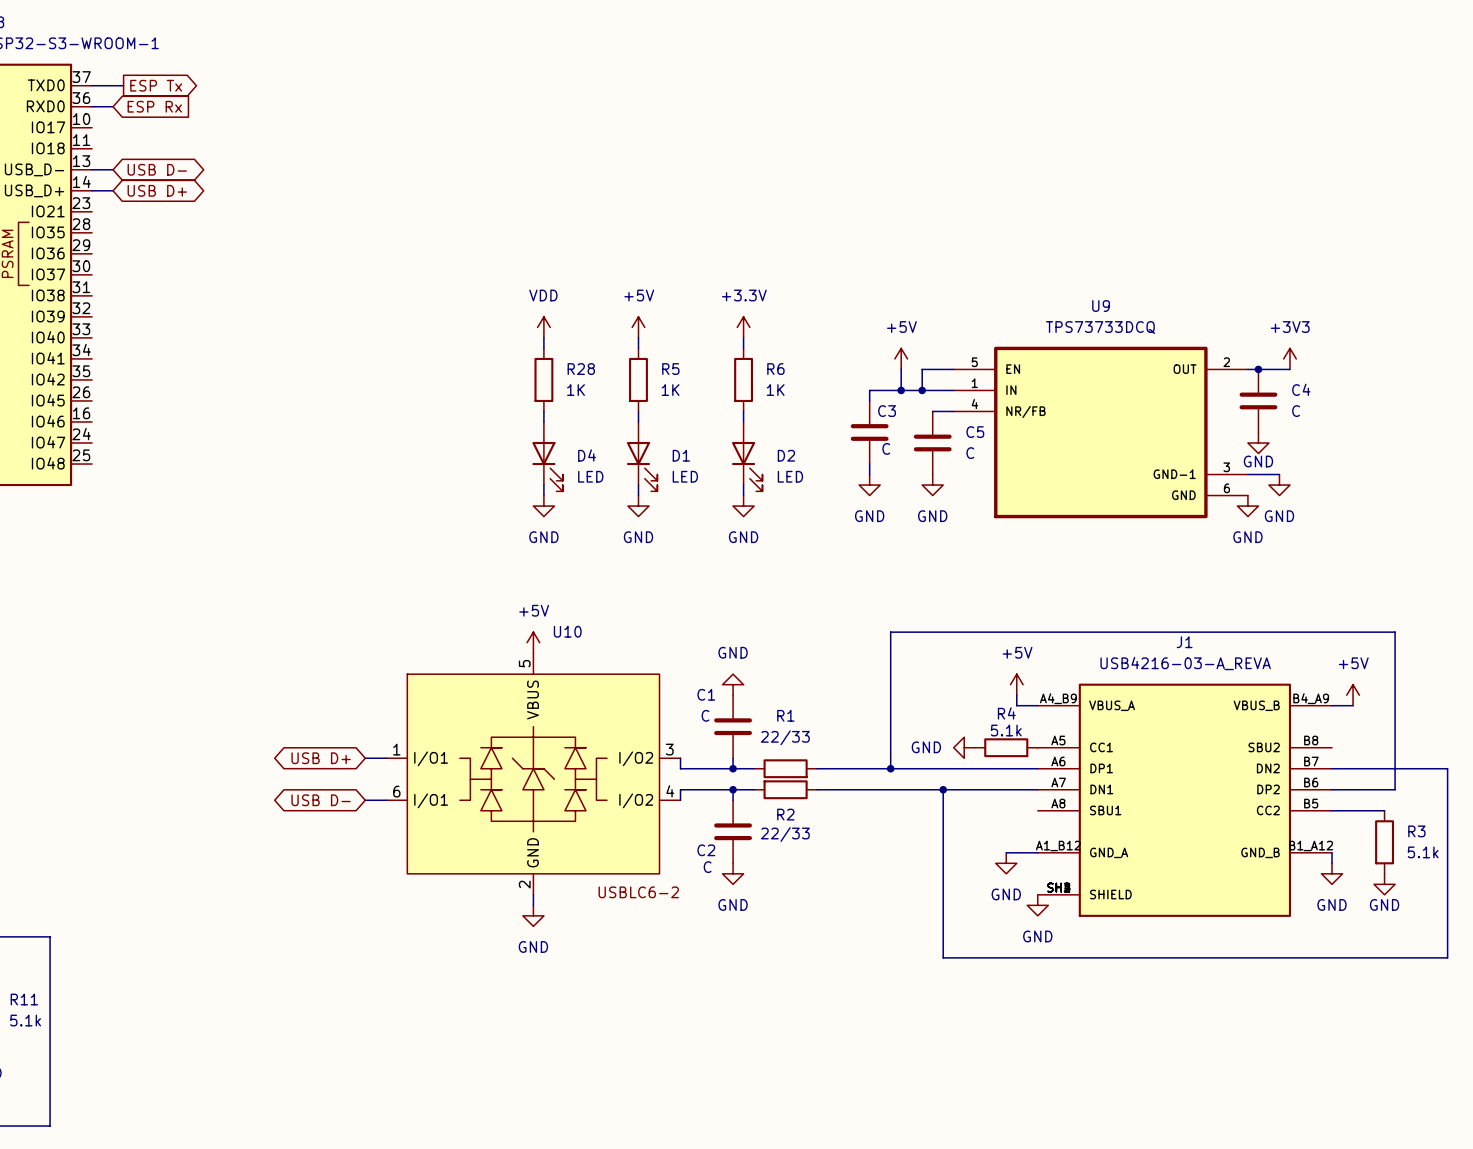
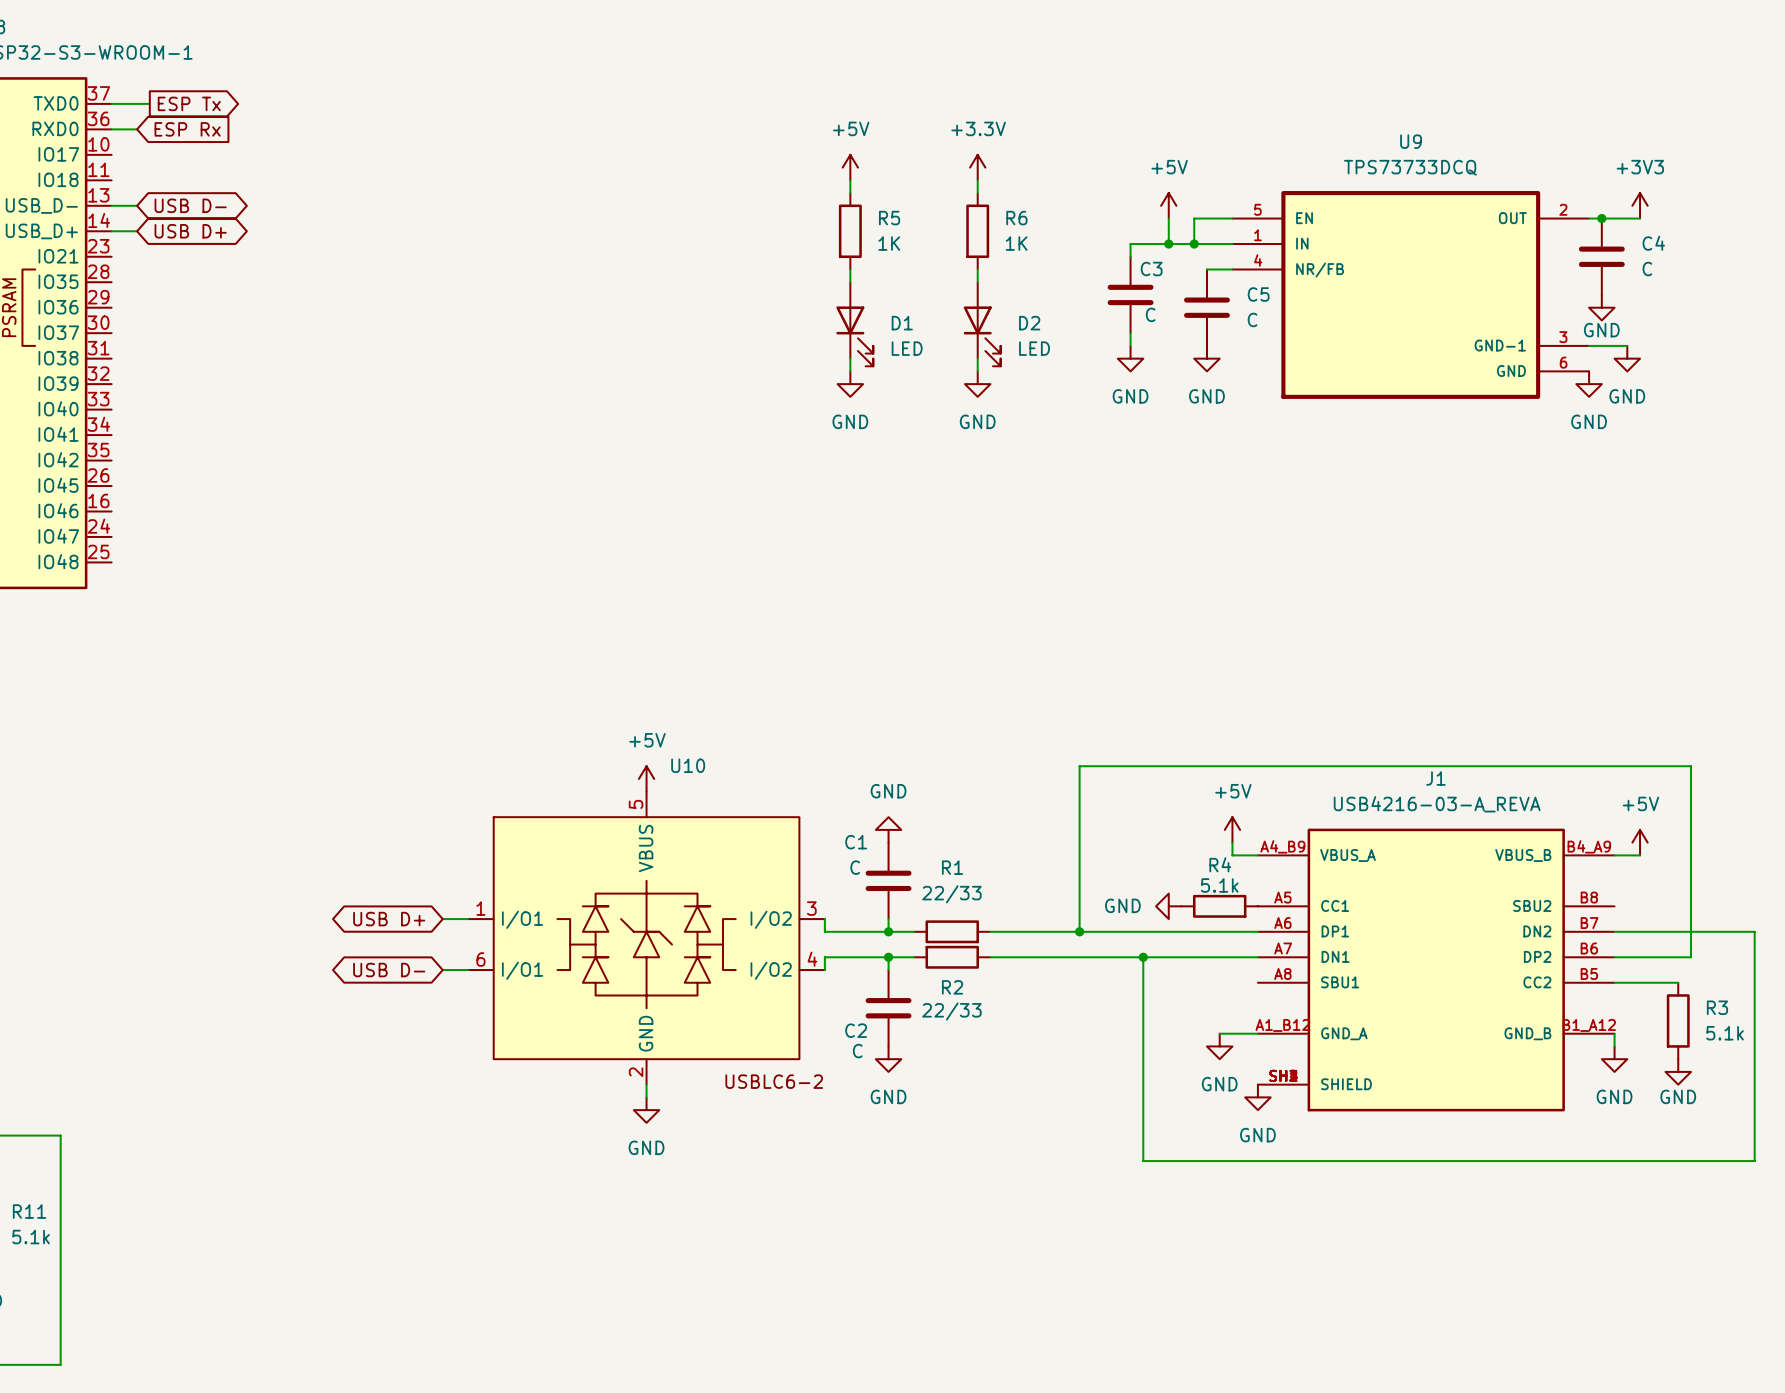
power symbol: none -> +5V (850, 167)
power symbol: none -> +5V (1168, 205)
junction: none -> (1601, 218)
junction: none -> (1168, 244)
junction: none -> (1194, 244)
power symbol: none -> GND (1601, 307)
power symbol: none -> GND (1130, 358)
power symbol: none -> GND (1206, 358)
power symbol: none -> GND (1627, 358)
power symbol: none -> GND (850, 384)
power symbol: none -> GND (977, 384)
power symbol: none -> GND (1589, 384)
power symbol: VDD (543, 327) -> none
power symbol: +5V (638, 327) -> none
power symbol position: +3.3V (743, 327) -> +3.3V (977, 167)
wire: (543, 337) (543, 348) -> none
wire: (638, 337) (638, 348) -> (850, 180) (850, 193)
wire: (743, 337) (743, 348) -> (977, 180) (977, 193)
power symbol: +5V (901, 358) -> none
power symbol position: +3V3 (1289, 358) -> +3V3 (1640, 205)
wire: (901, 369) (901, 390) -> (1168, 218) (1168, 244)
wire: (953, 369) (922, 369) (922, 390) -> (1232, 218) (1194, 218) (1194, 244)
wire: (1247, 369) (1289, 369) -> (1589, 218) (1640, 218)
junction: (1258, 369) -> none
R28: 1K (543, 379) -> none
R5 position: (638, 379) -> (850, 231)
R6 position: (743, 379) -> (977, 231)
junction: (901, 390) -> none
junction: (922, 390) -> none
wire: (953, 390) (869, 390) (869, 400) -> (1232, 244) (1130, 244) (1130, 256)
C4 position: (1258, 400) -> (1601, 256)
wire: (543, 411) (543, 421) -> none
wire: (638, 411) (638, 421) -> (850, 269) (850, 282)
wire: (743, 411) (743, 421) -> (977, 269) (977, 282)
wire: (932, 411) (953, 411) -> (1206, 269) (1232, 269)
C3 position: (869, 432) -> (1130, 294)
U9 position: (1100, 432) -> (1410, 294)
C5 position: (932, 443) -> (1206, 307)
power symbol: GND (1258, 443) -> none
D4: LED (547, 456) -> none
D1 position: (642, 456) -> (854, 324)
D2 position: (747, 456) -> (982, 324)
wire: (869, 464) (869, 474) -> (1130, 333) (1130, 345)
wire: (1247, 474) (1279, 474) -> (1589, 345) (1627, 345)
wire: (543, 485) (543, 495) -> none
wire: (638, 485) (638, 495) -> (850, 358) (850, 371)
wire: (743, 485) (743, 495) -> (977, 358) (977, 371)
power symbol: GND (869, 485) -> none
power symbol: GND (932, 485) -> none
power symbol: GND (1279, 485) -> none
power symbol: GND (543, 506) -> none
power symbol: GND (638, 506) -> none
power symbol: GND (743, 506) -> none
power symbol: GND (1247, 506) -> none

